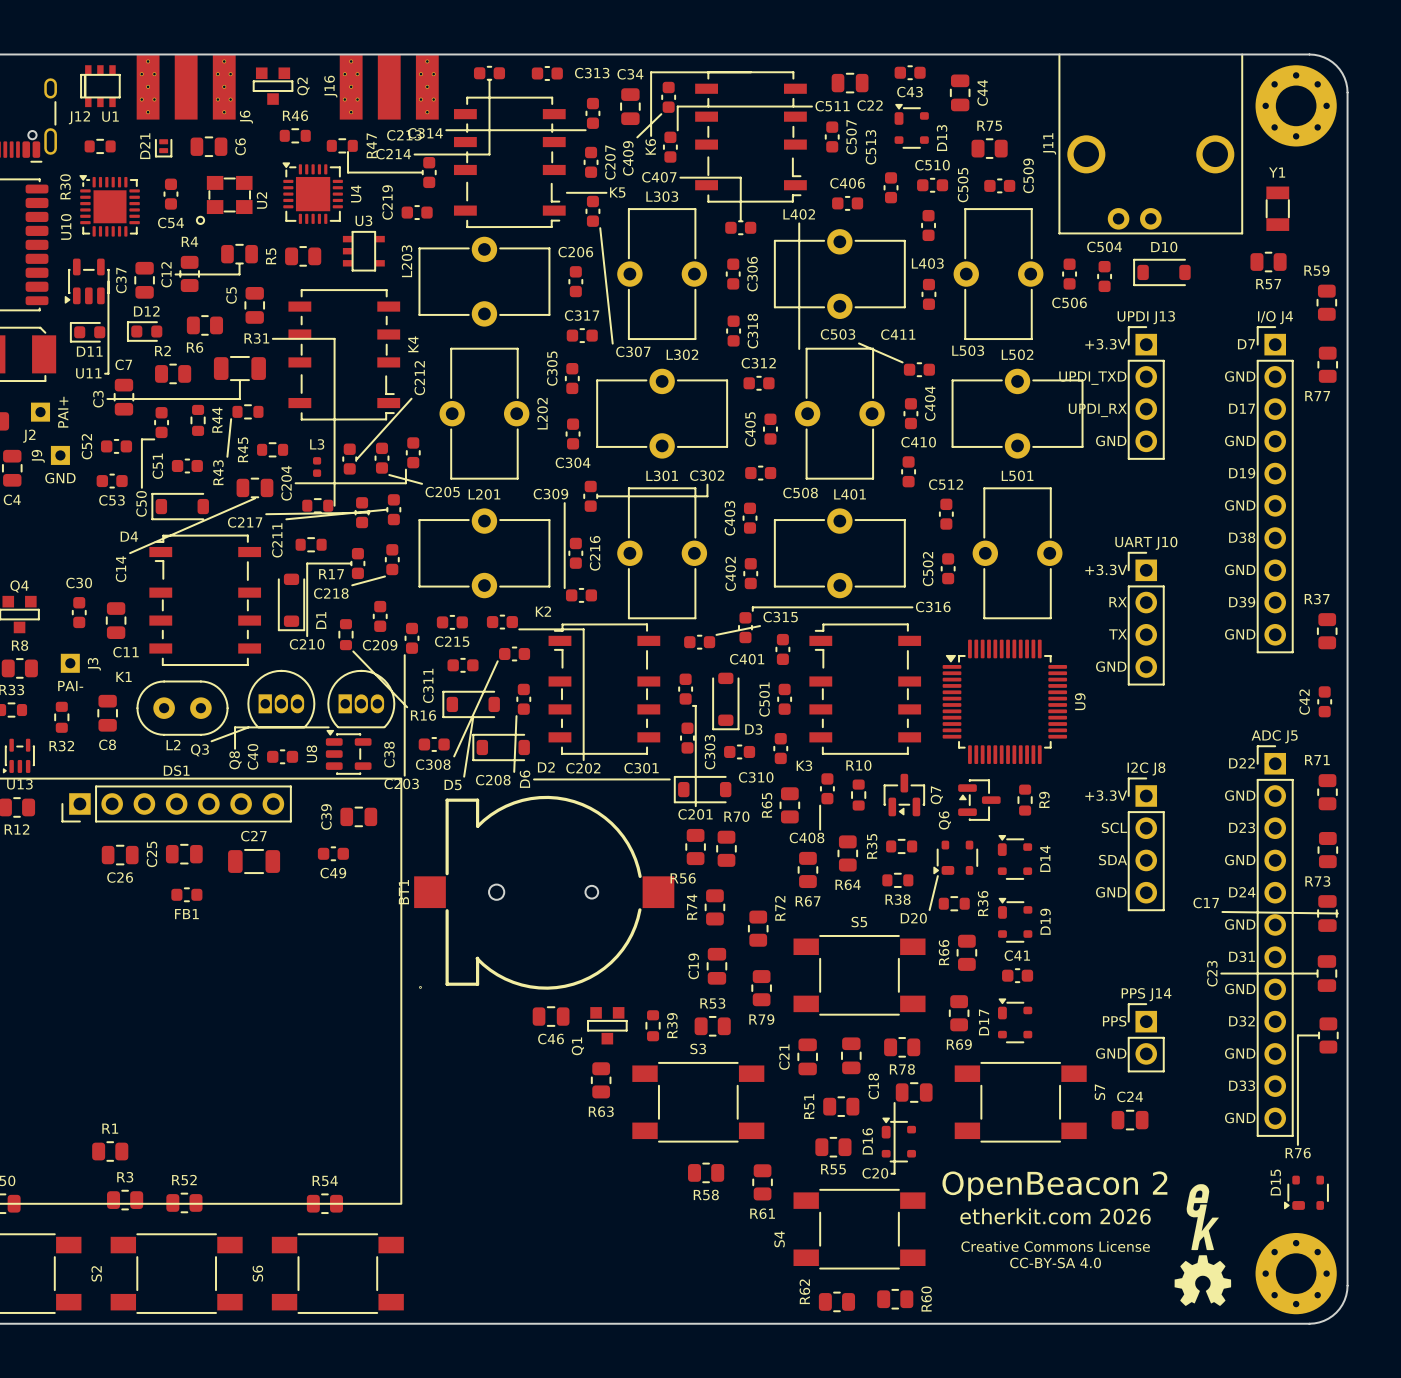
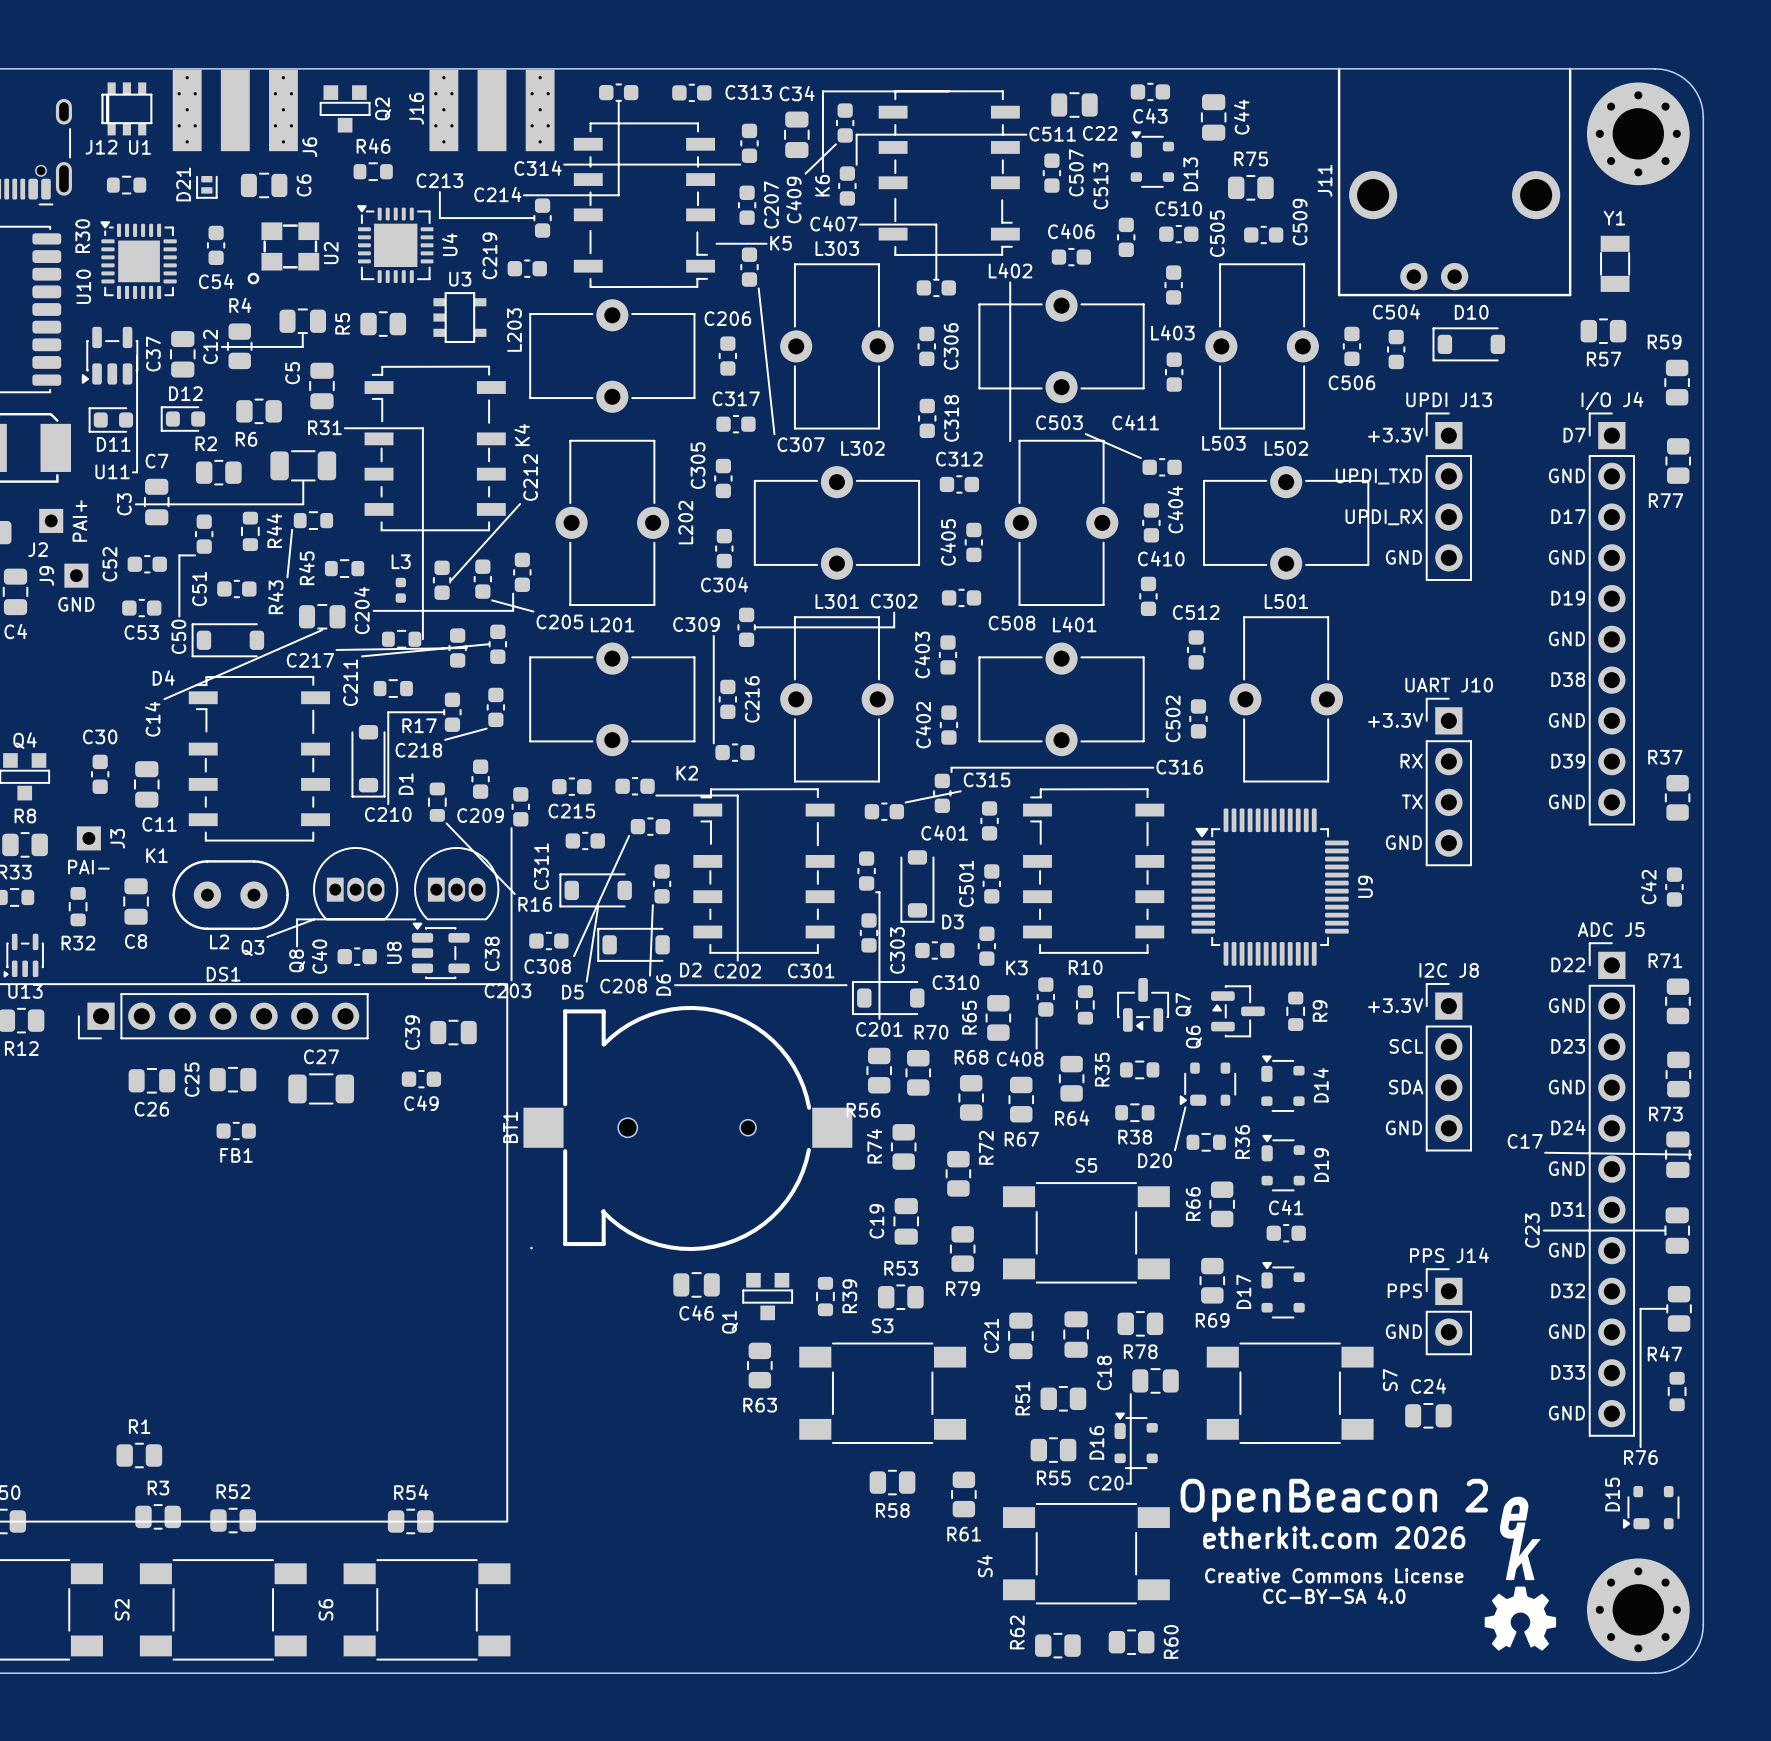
C213 name position: C213 (404, 135) -> C213 (439, 180)
R47 rotation: 0° (342, 145) -> 90° clockwise (1677, 1391)
R47 position: (342, 145) -> (1677, 1391)
R47 name position: R47 (371, 145) -> R47 (1664, 1353)
K4 rotation: 0° (344, 354) -> 180° (435, 448)
R68: none -> (971, 1097)

